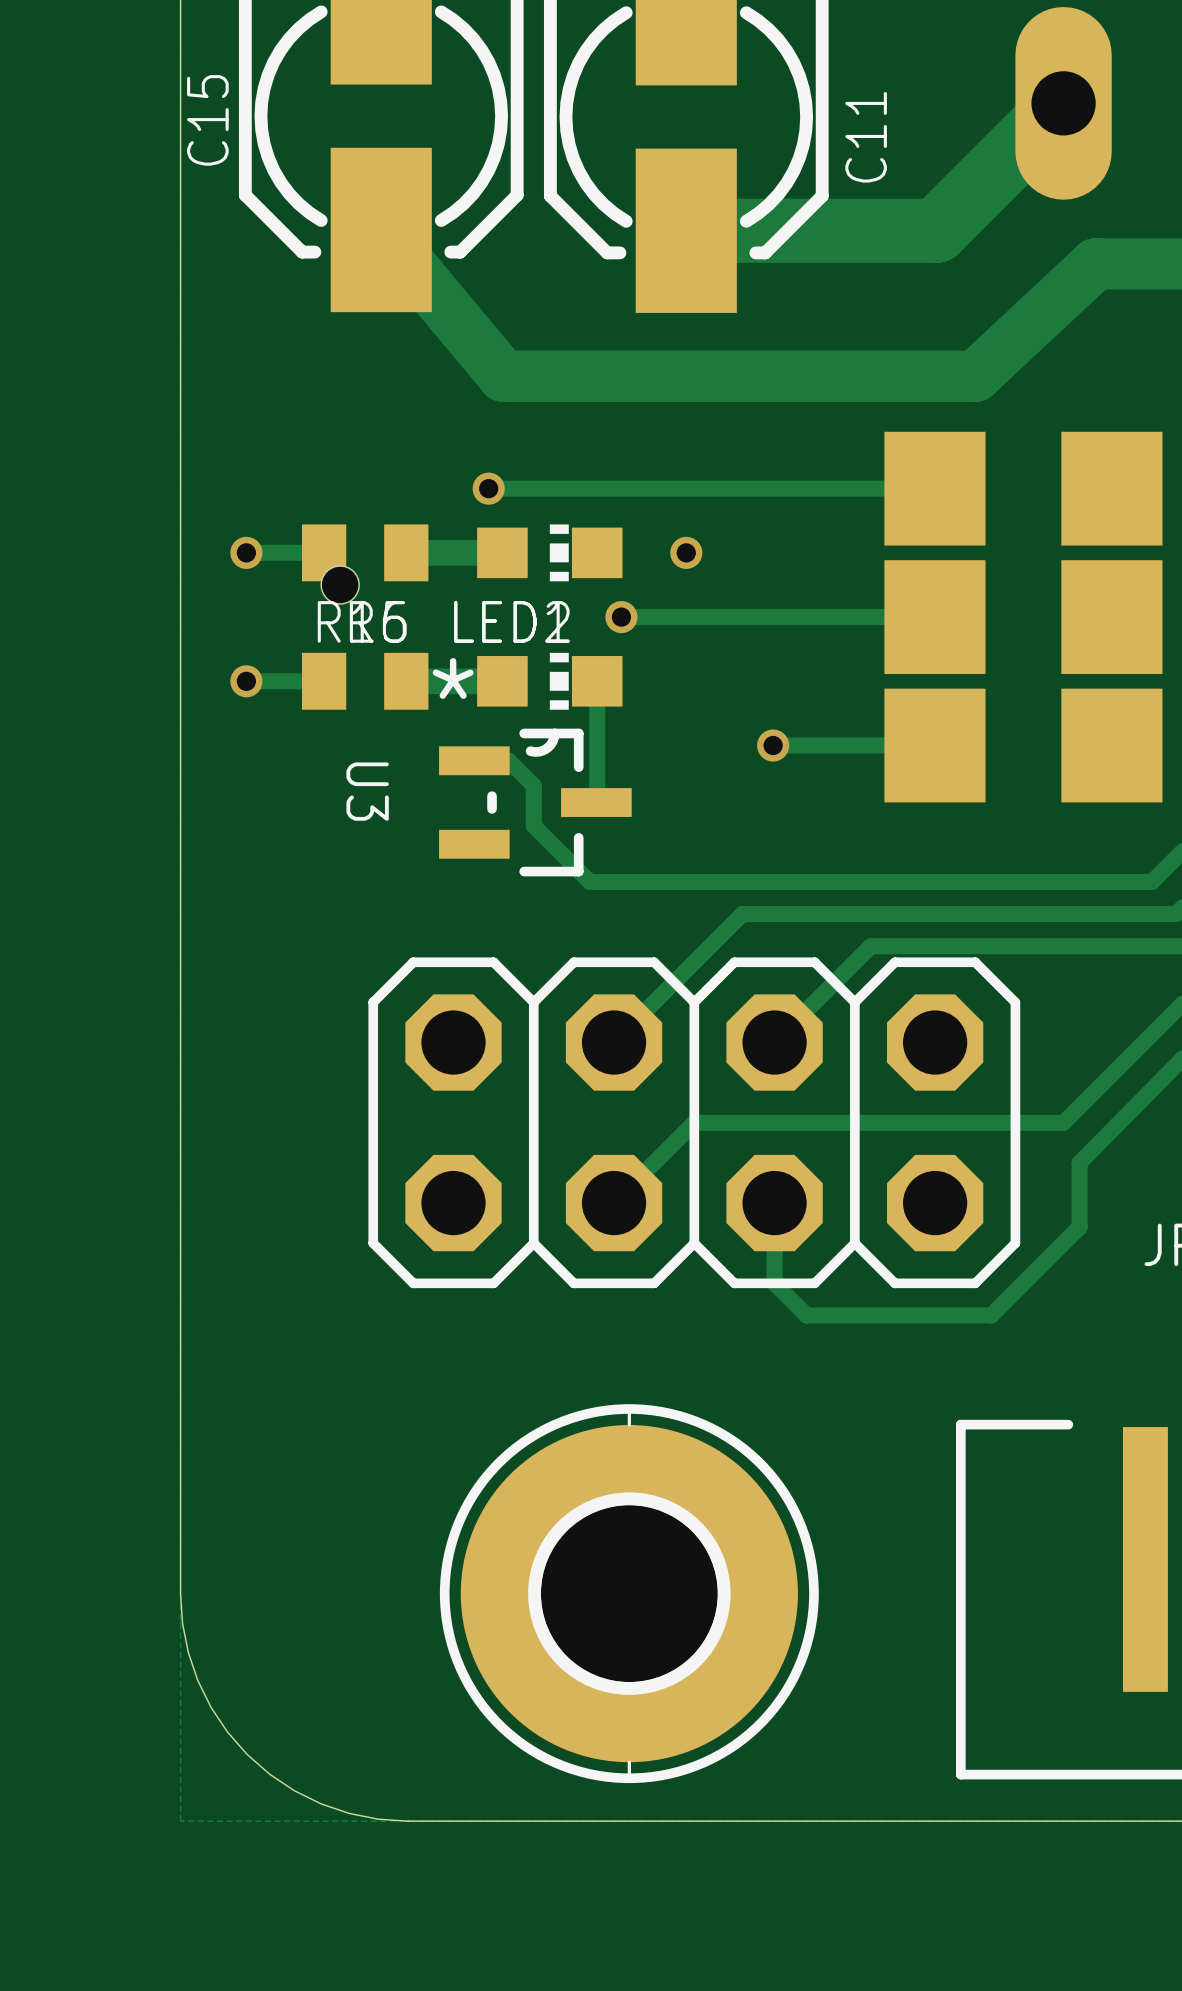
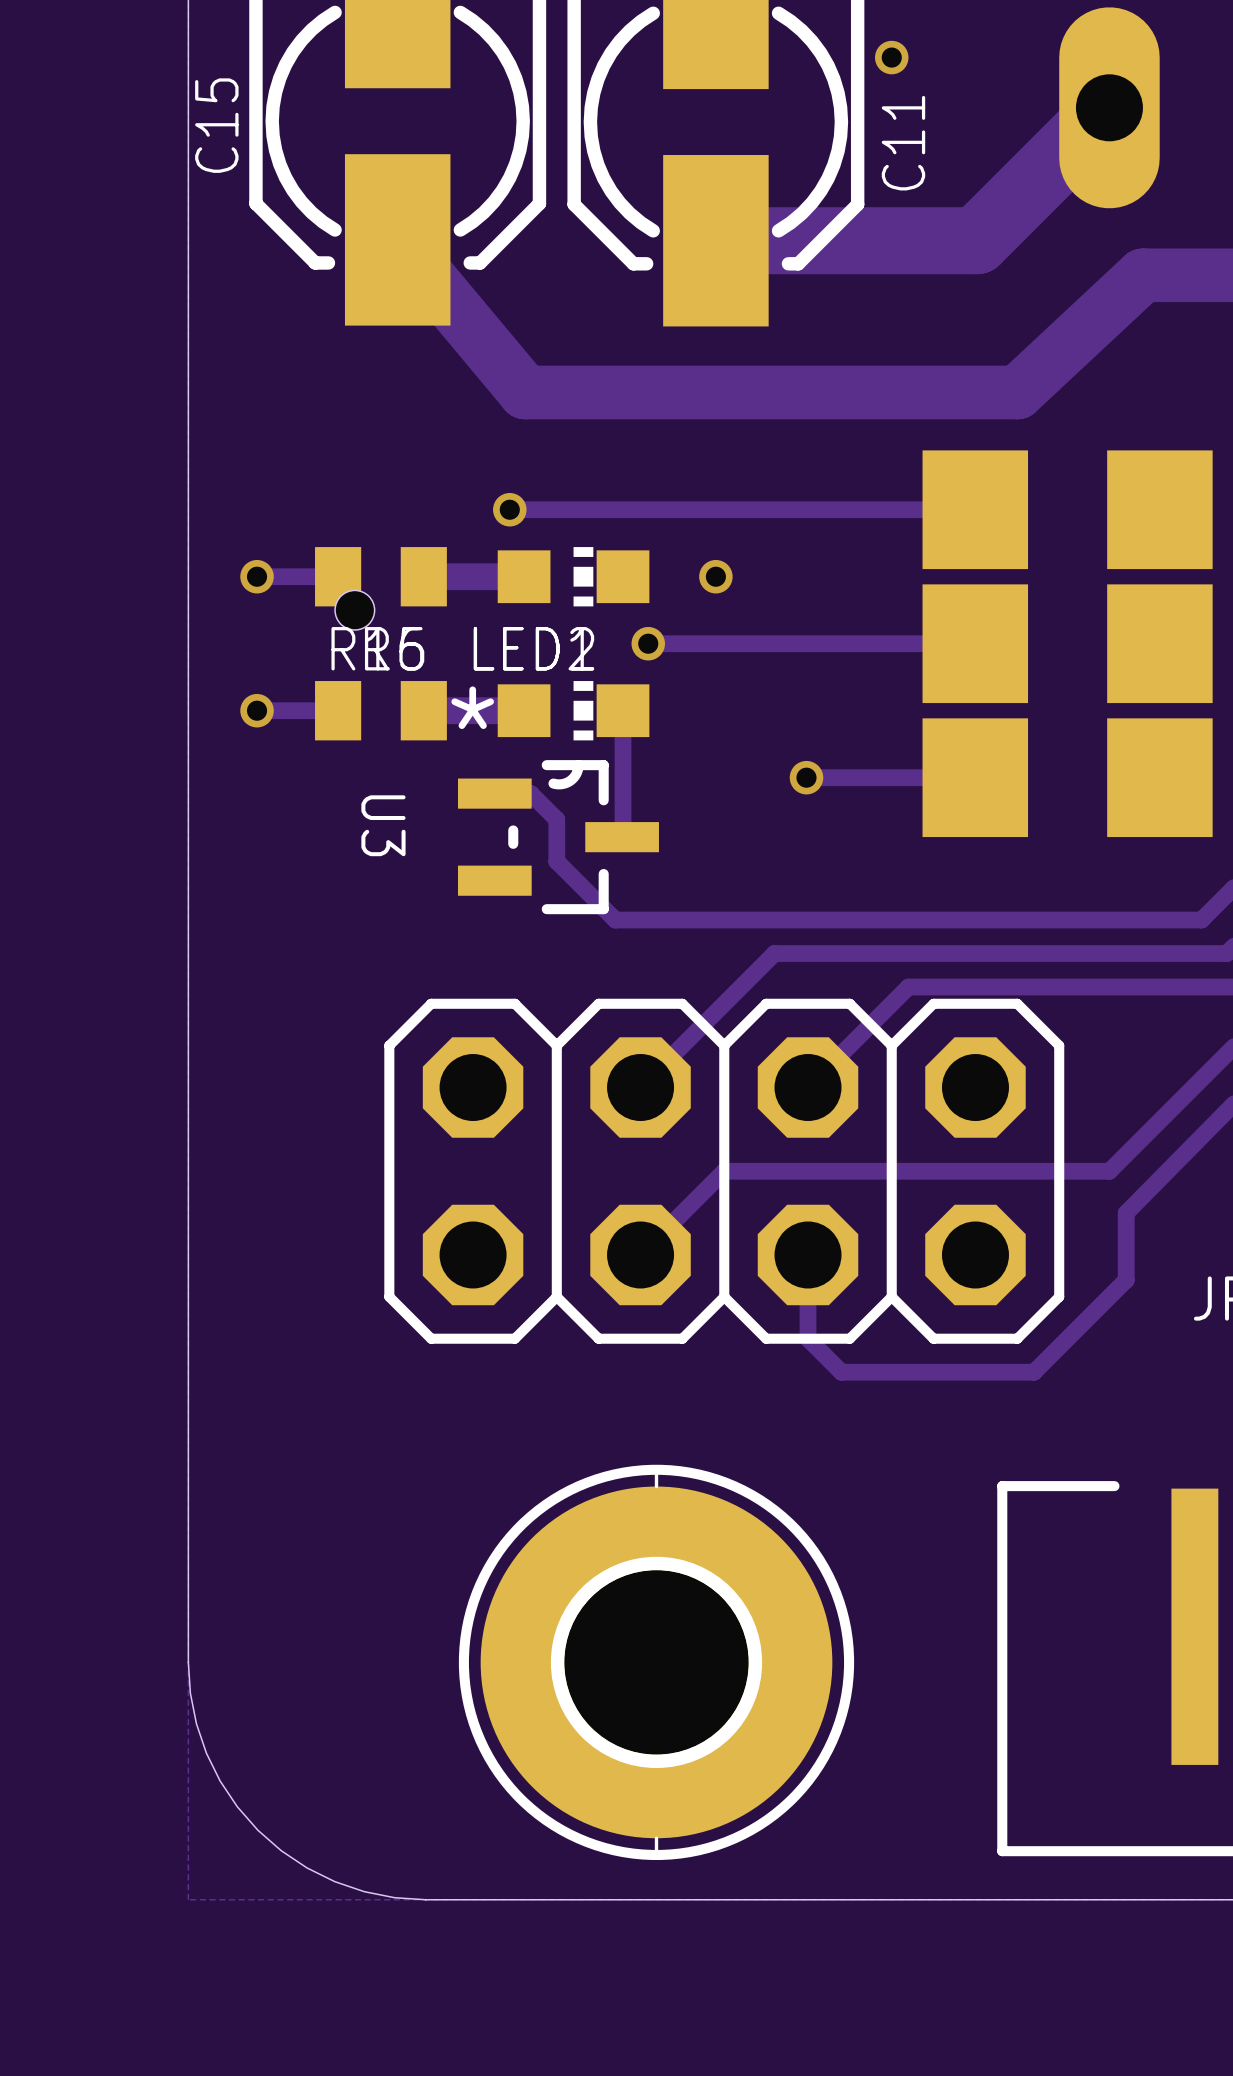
via: none -> (891, 57)

